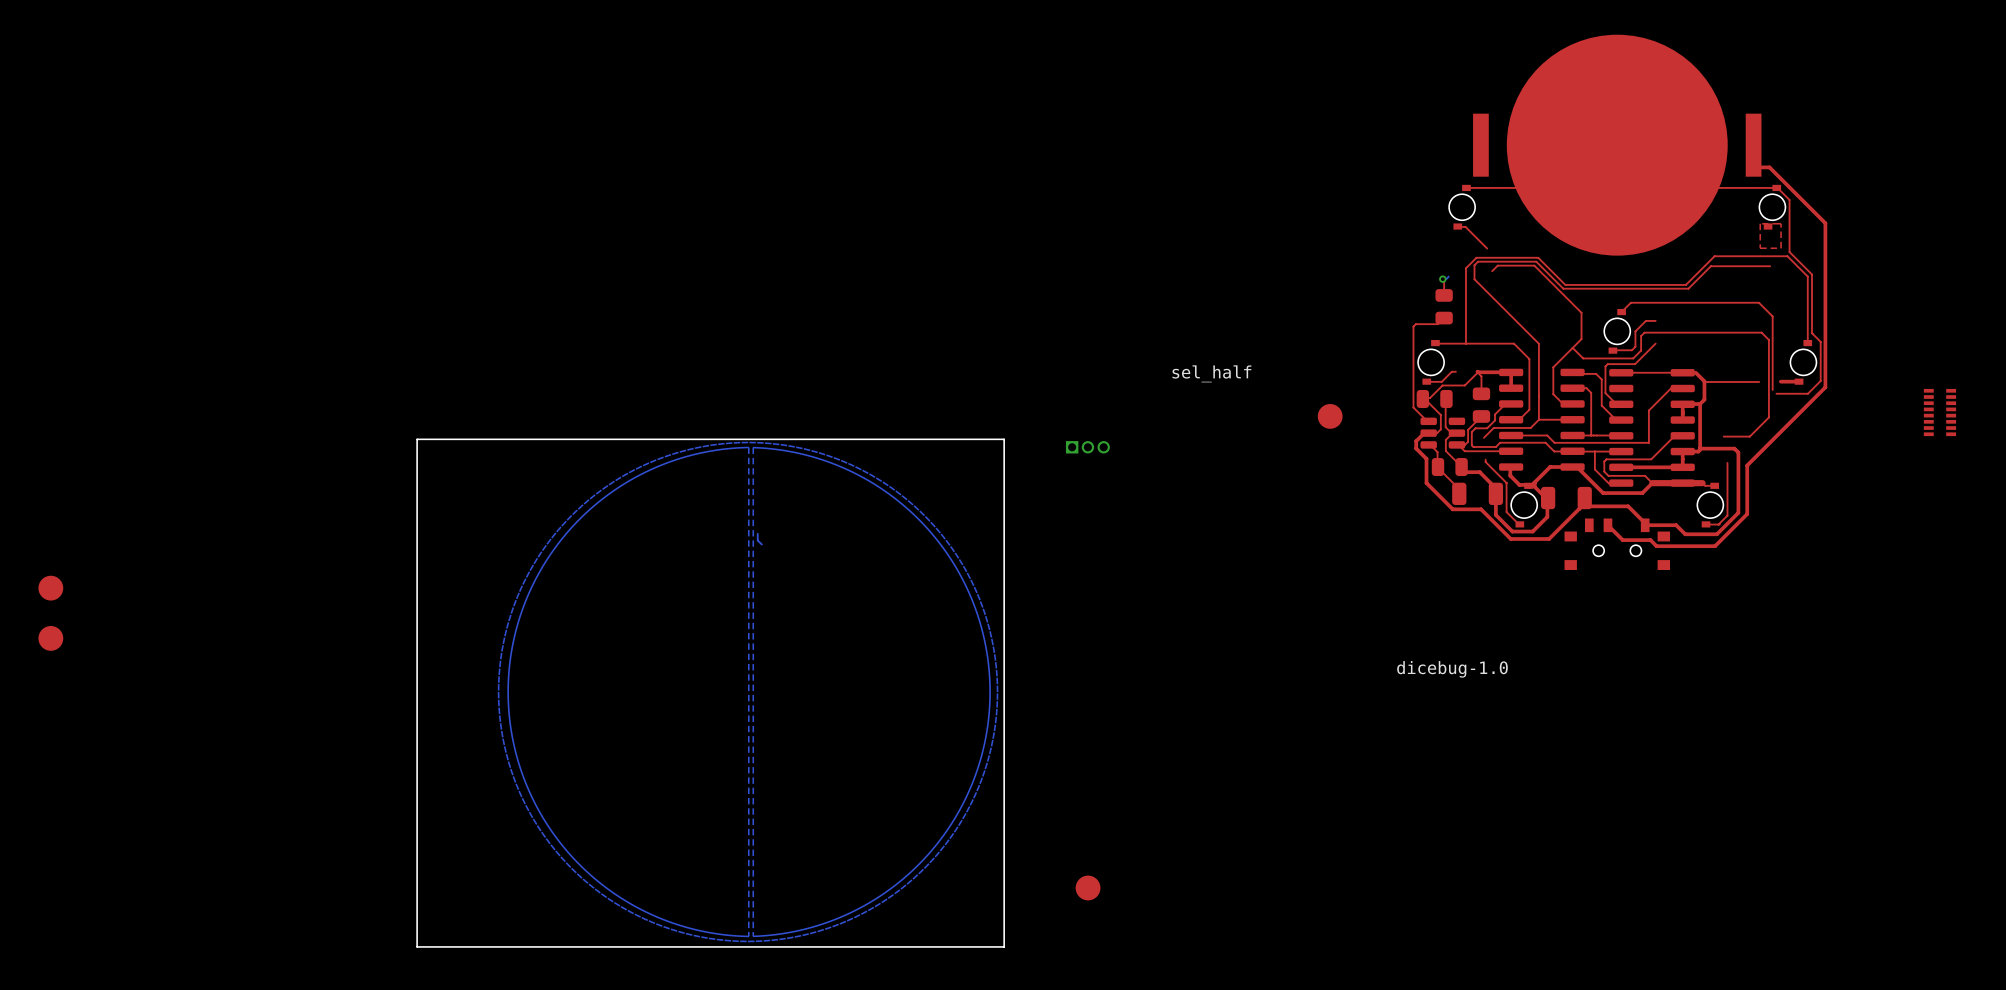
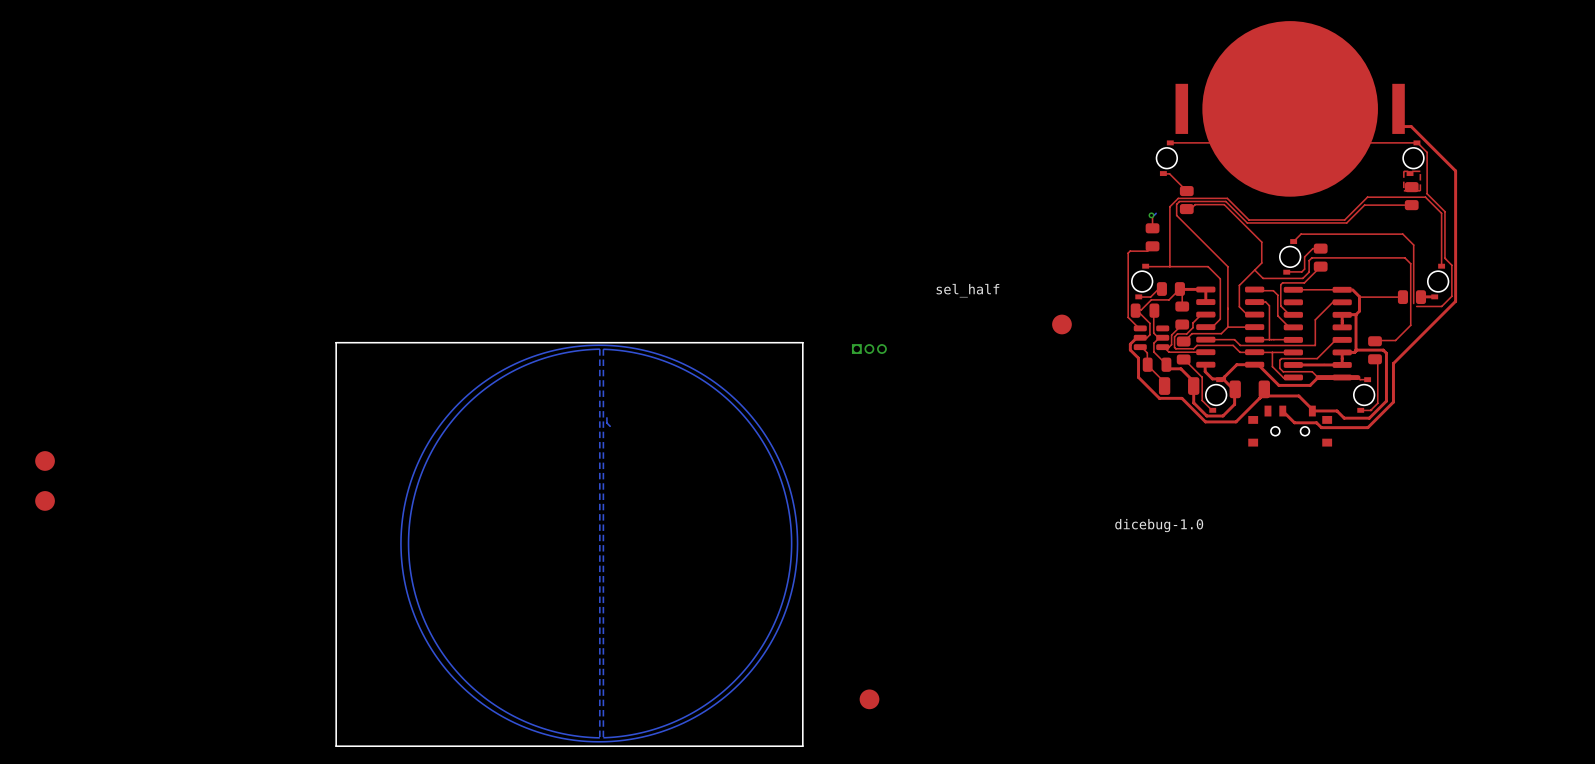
part: none -> (1411, 196)
part: none -> (1186, 200)
part: none -> (1320, 257)
part: none -> (1170, 289)
part: none -> (1411, 297)
part: (1939, 412) -> none
part: none -> (1375, 350)
part: none -> (1183, 350)

